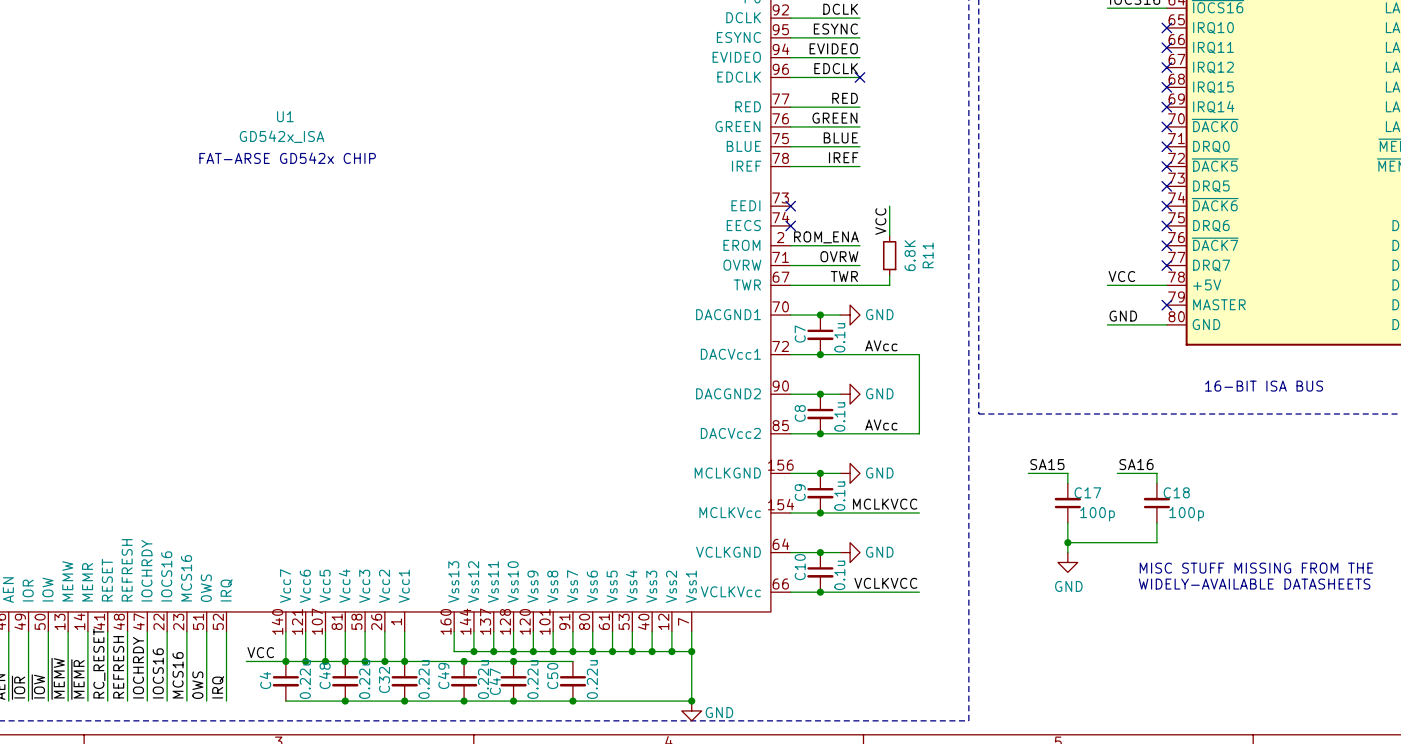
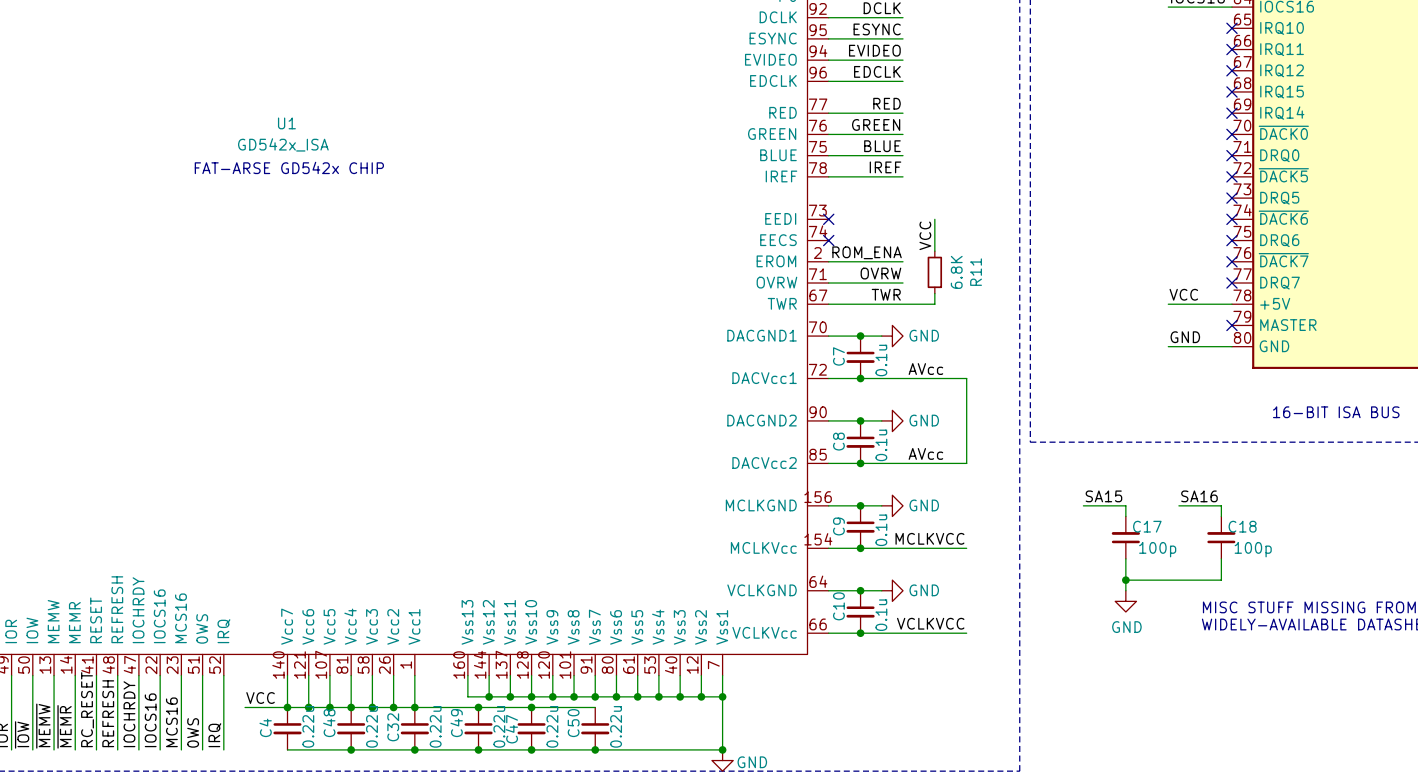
no-connect mark: (859, 77) -> none

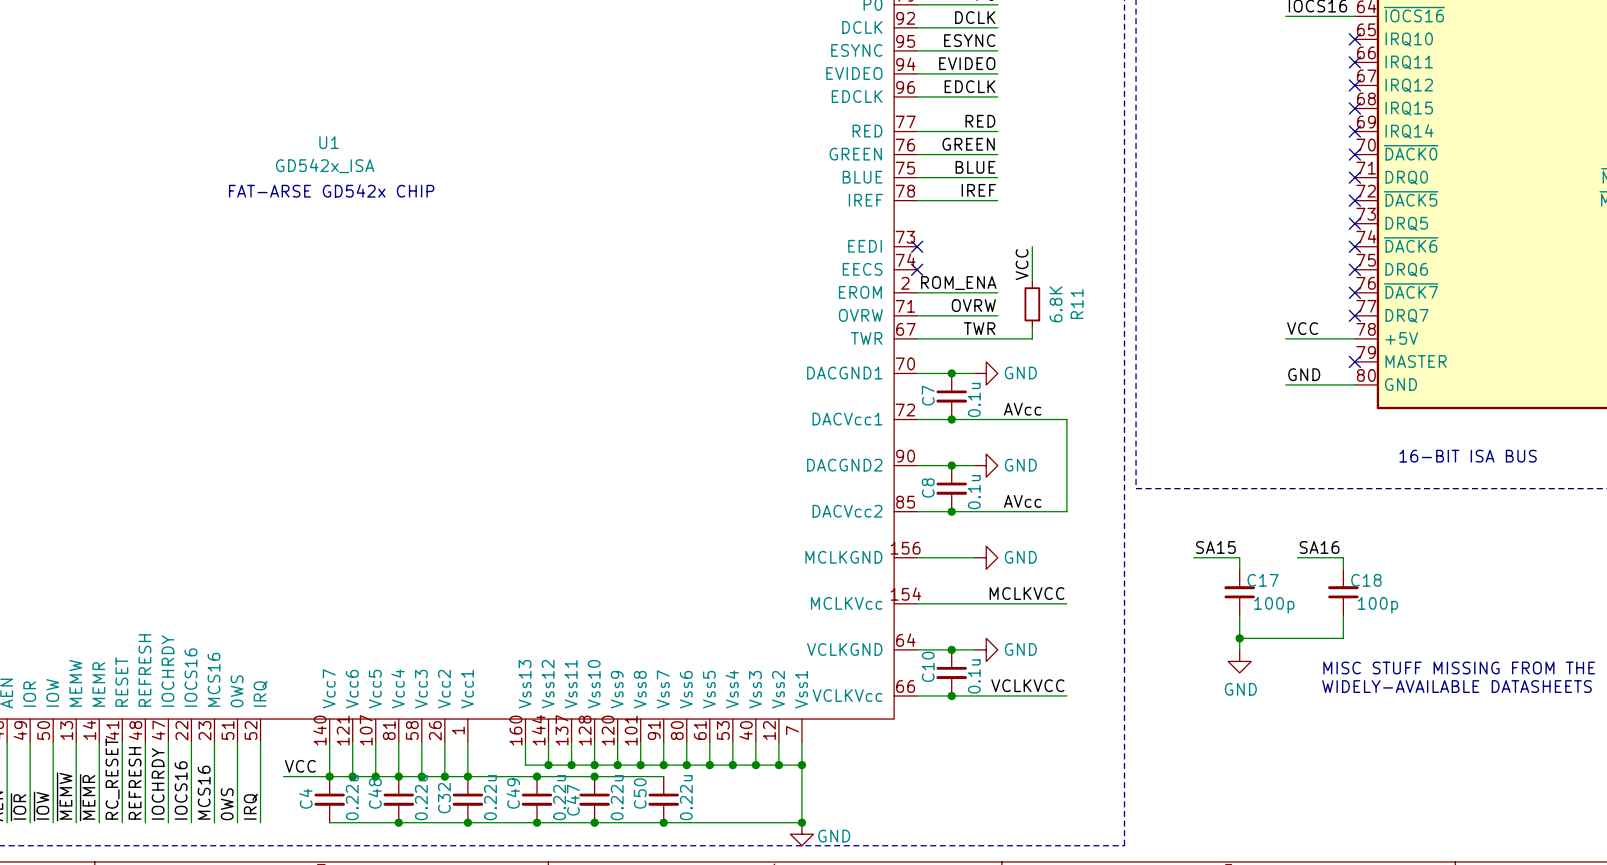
junction: (860, 505) -> none
C9: 0.1u (860, 527) -> none
junction: (860, 548) -> none

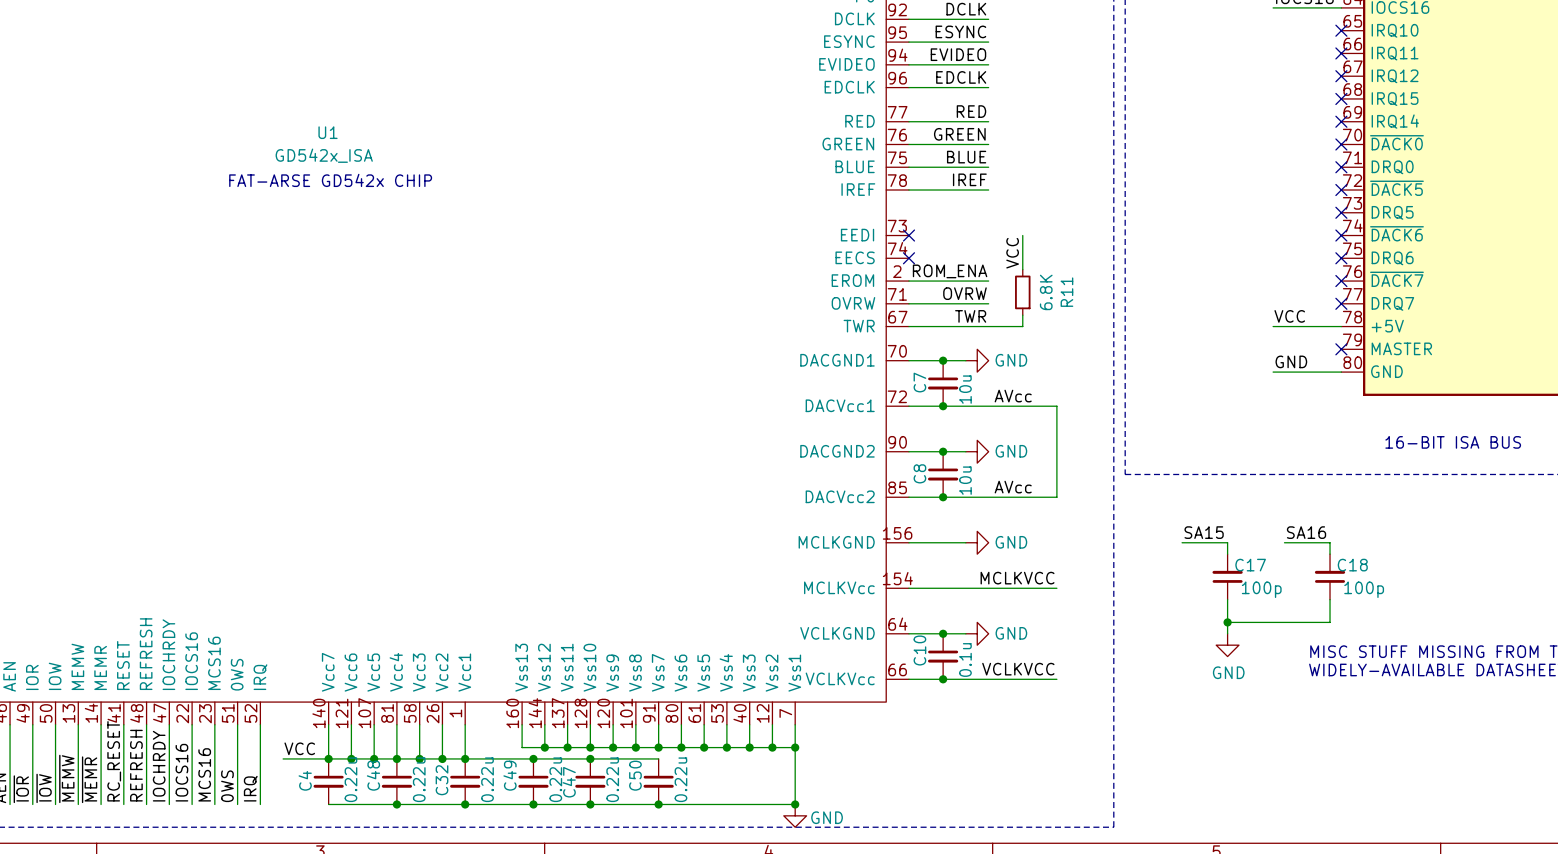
C7 value: 0.1u (974, 399) -> 10u (965, 389)
C8 value: 0.1u (974, 492) -> 10u (965, 480)

